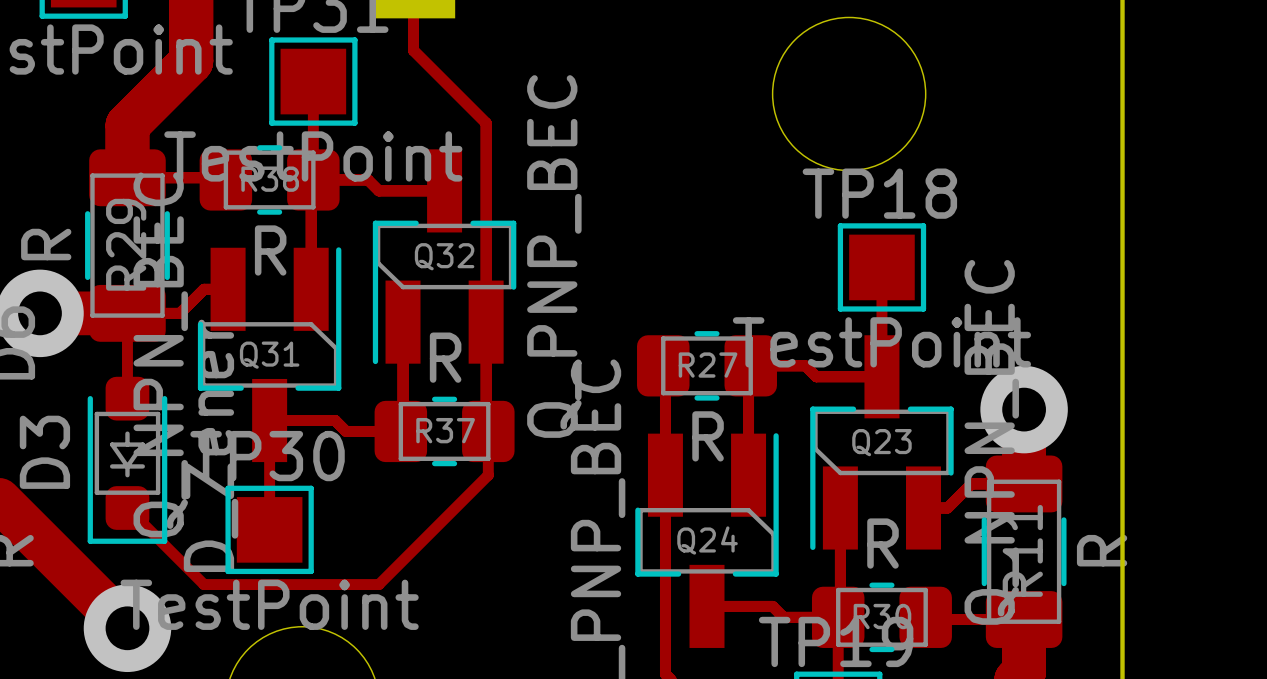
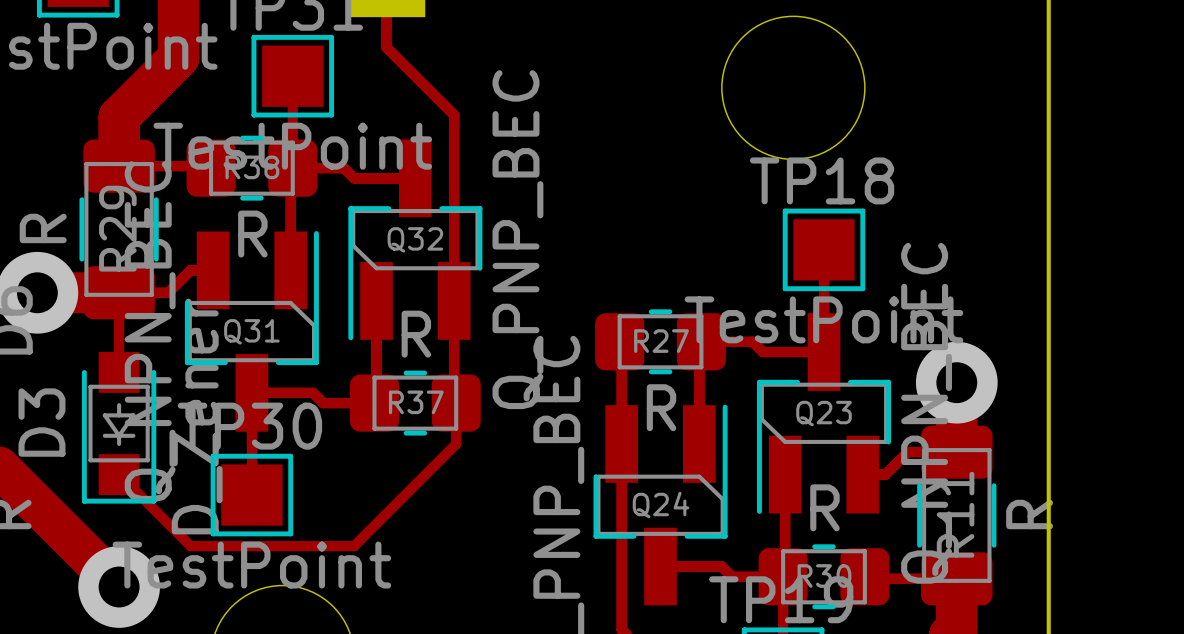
D3 footprint: [87, 376, 168, 544] -> [81, 352, 157, 504]

